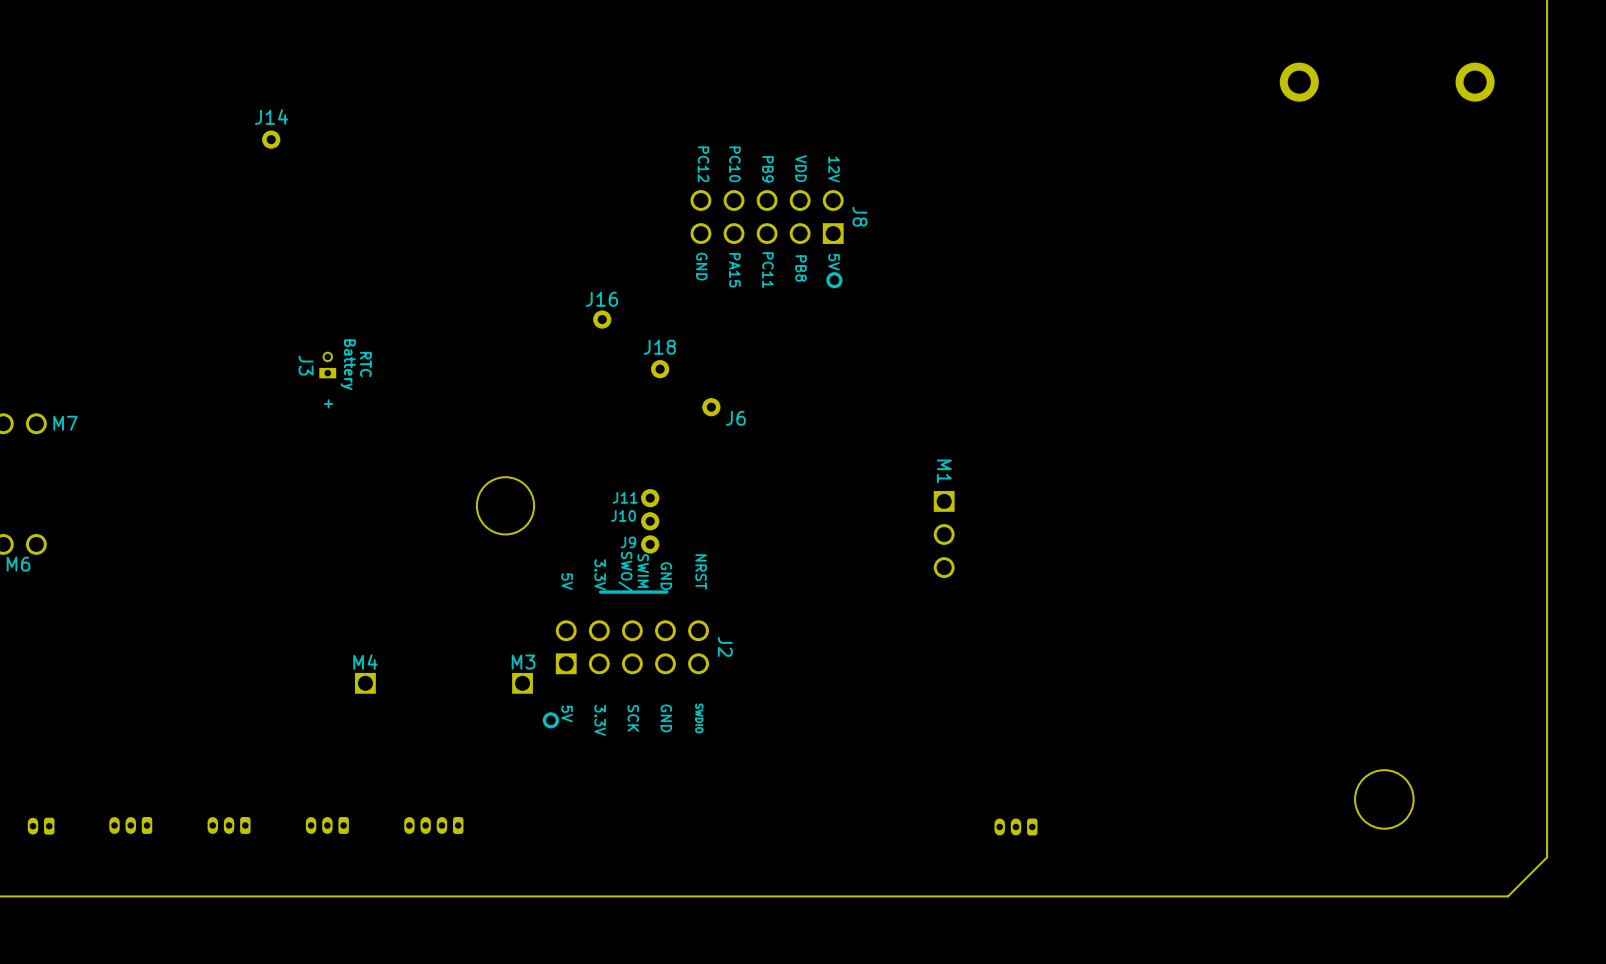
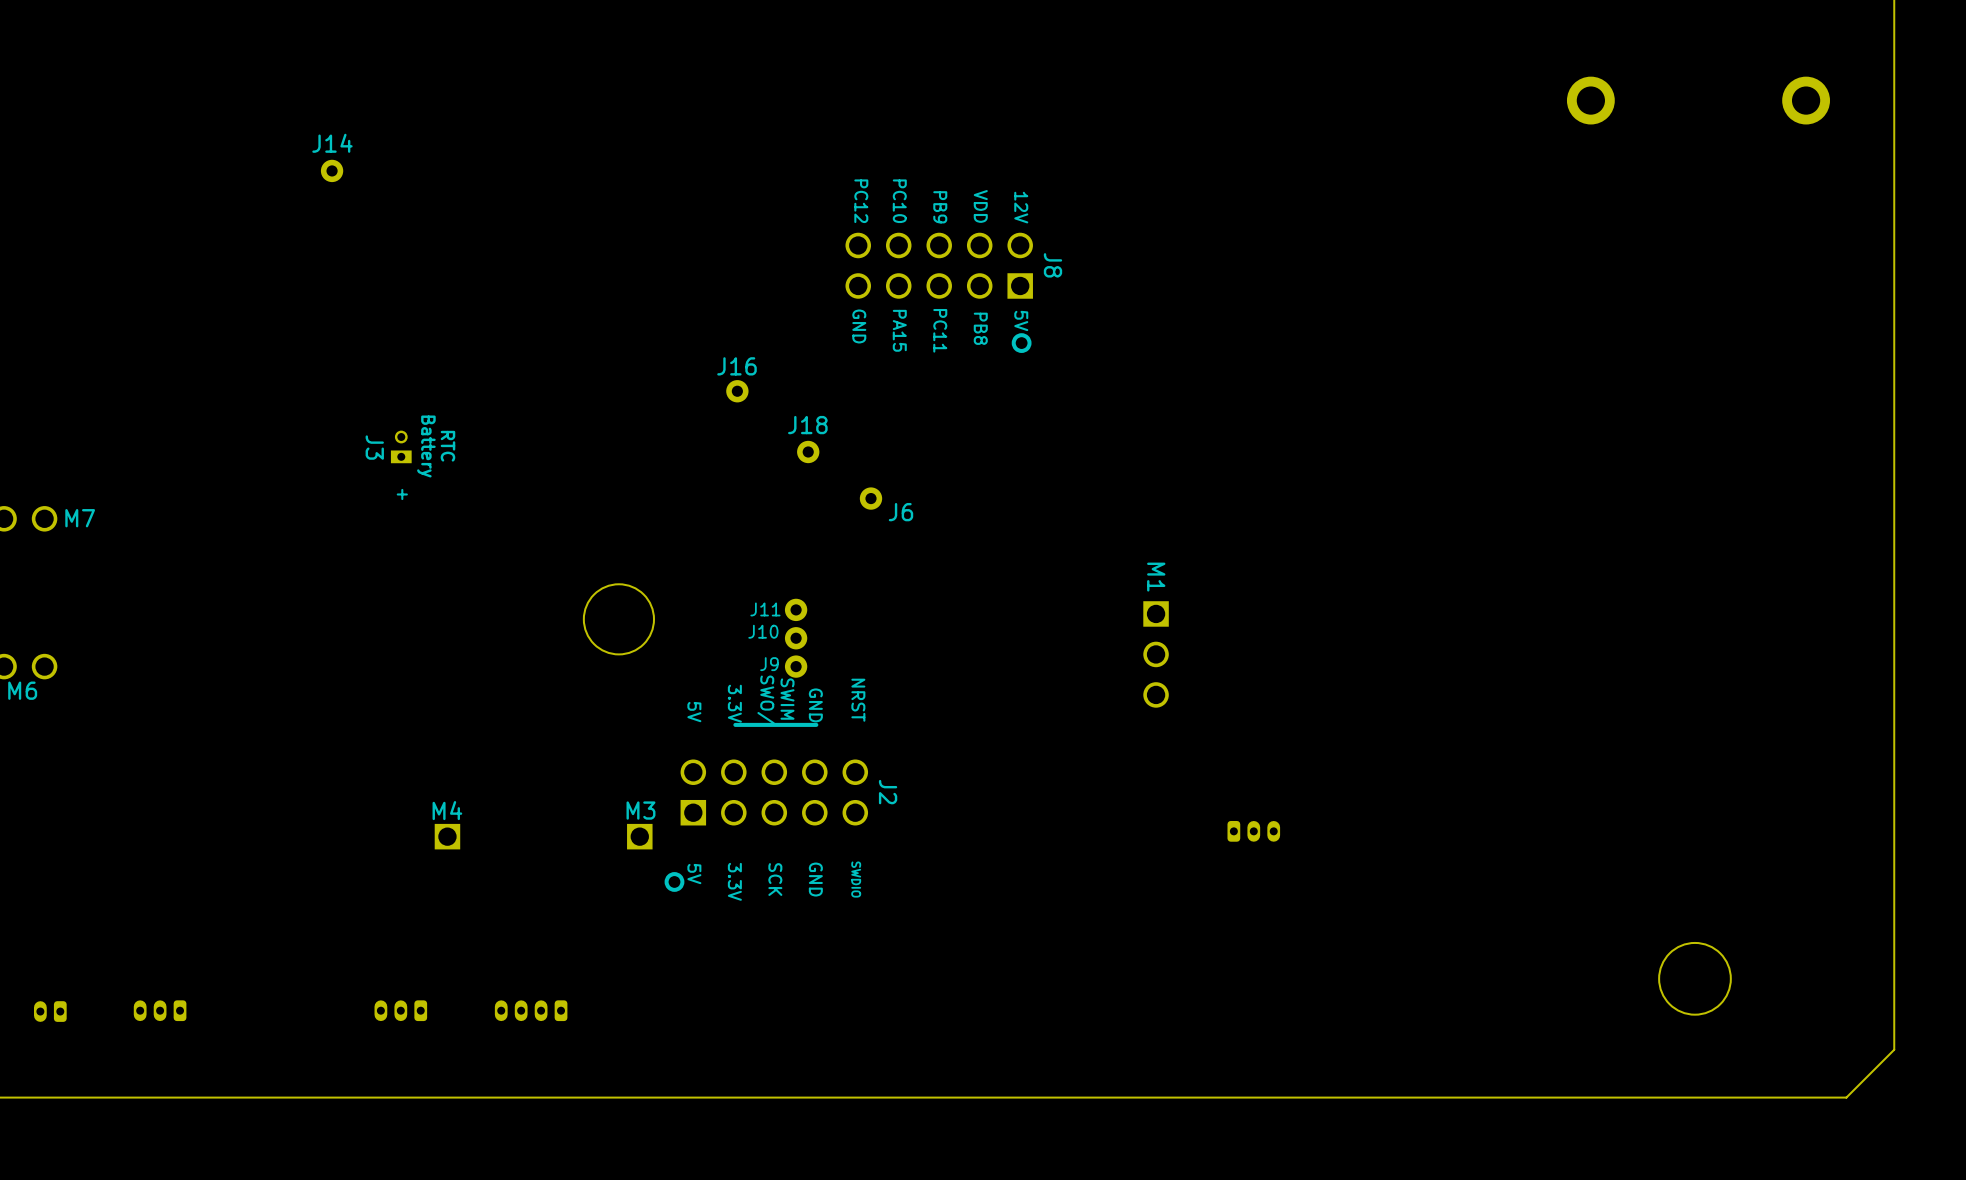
part: (229, 825) -> none
part rotation: 0° (1015, 826) -> 180° (1253, 831)
part position: (1015, 826) -> (1253, 831)

